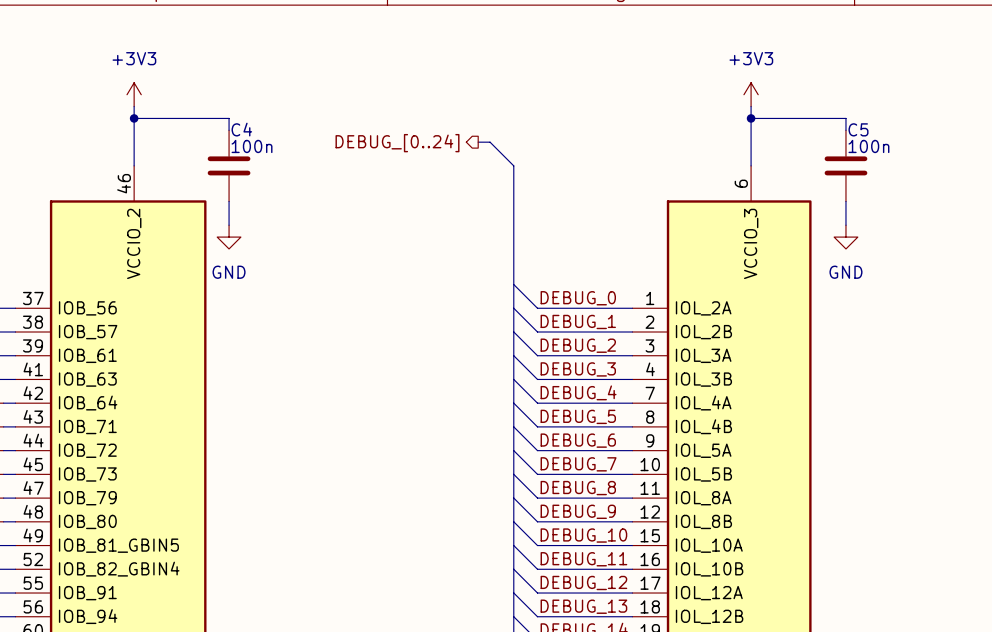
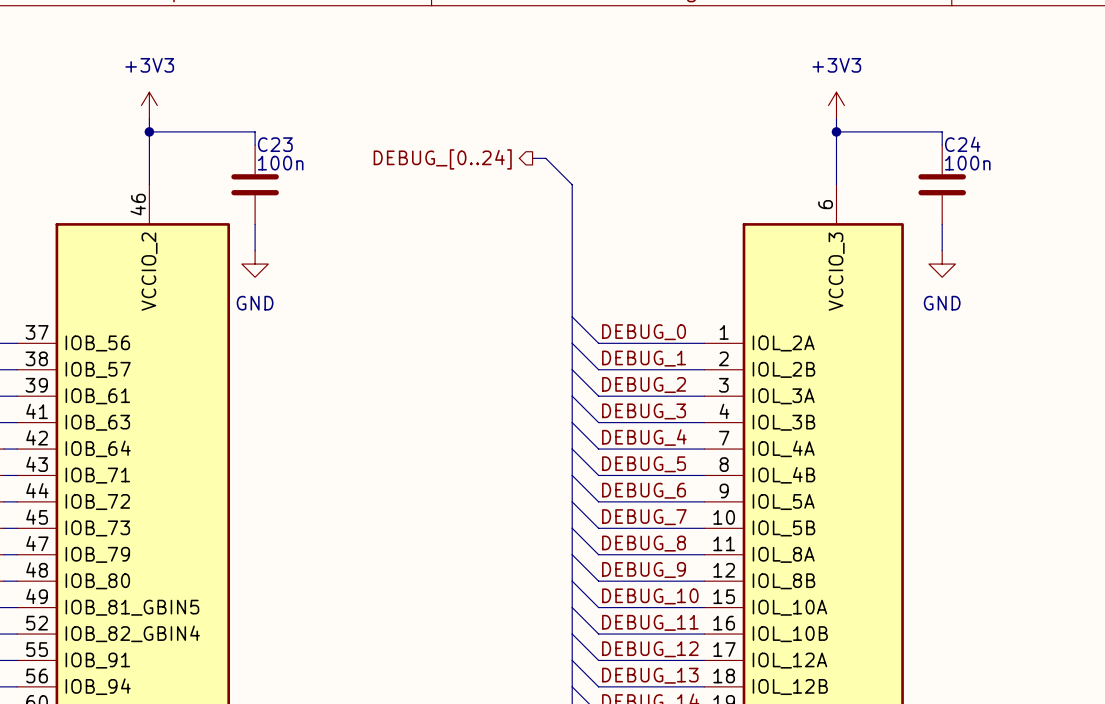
C4 name: C4 (241, 129) -> C23 (275, 144)
C5 name: C5 (858, 129) -> C24 (962, 144)

